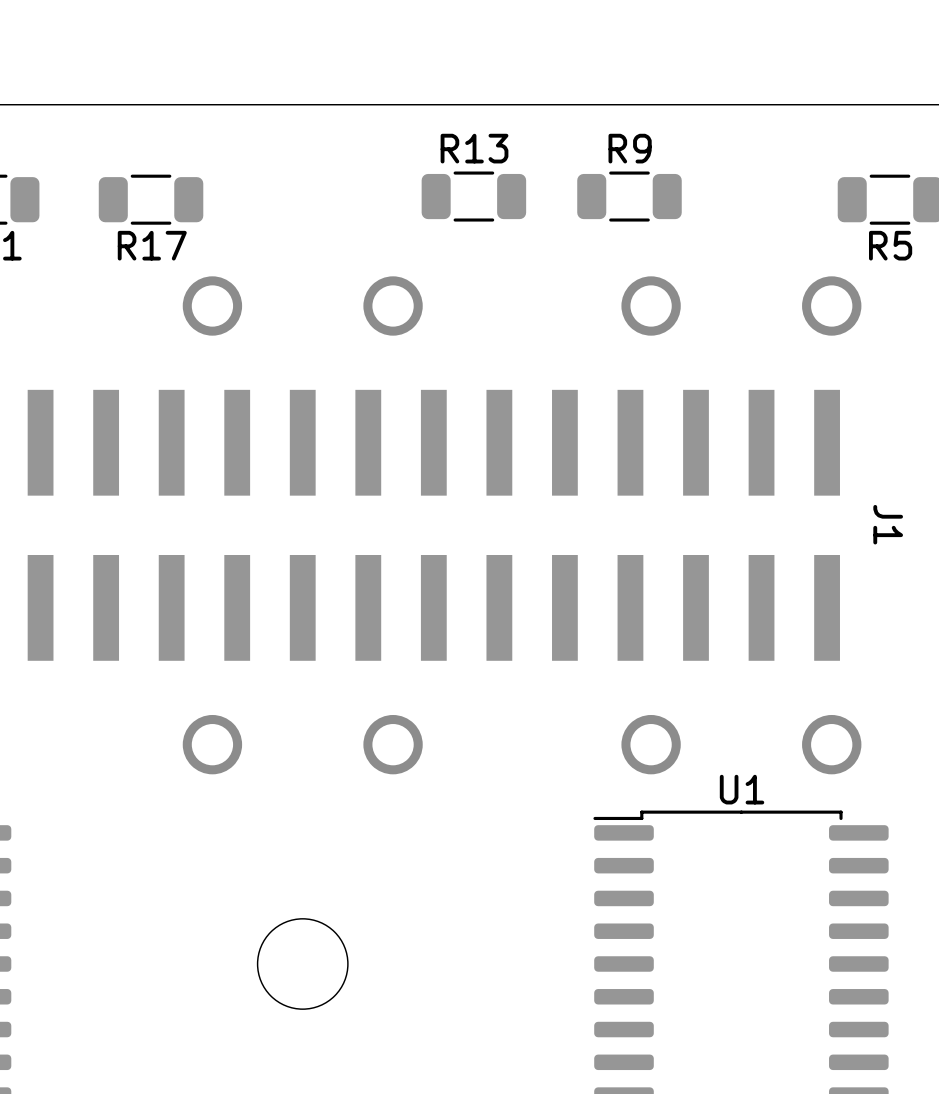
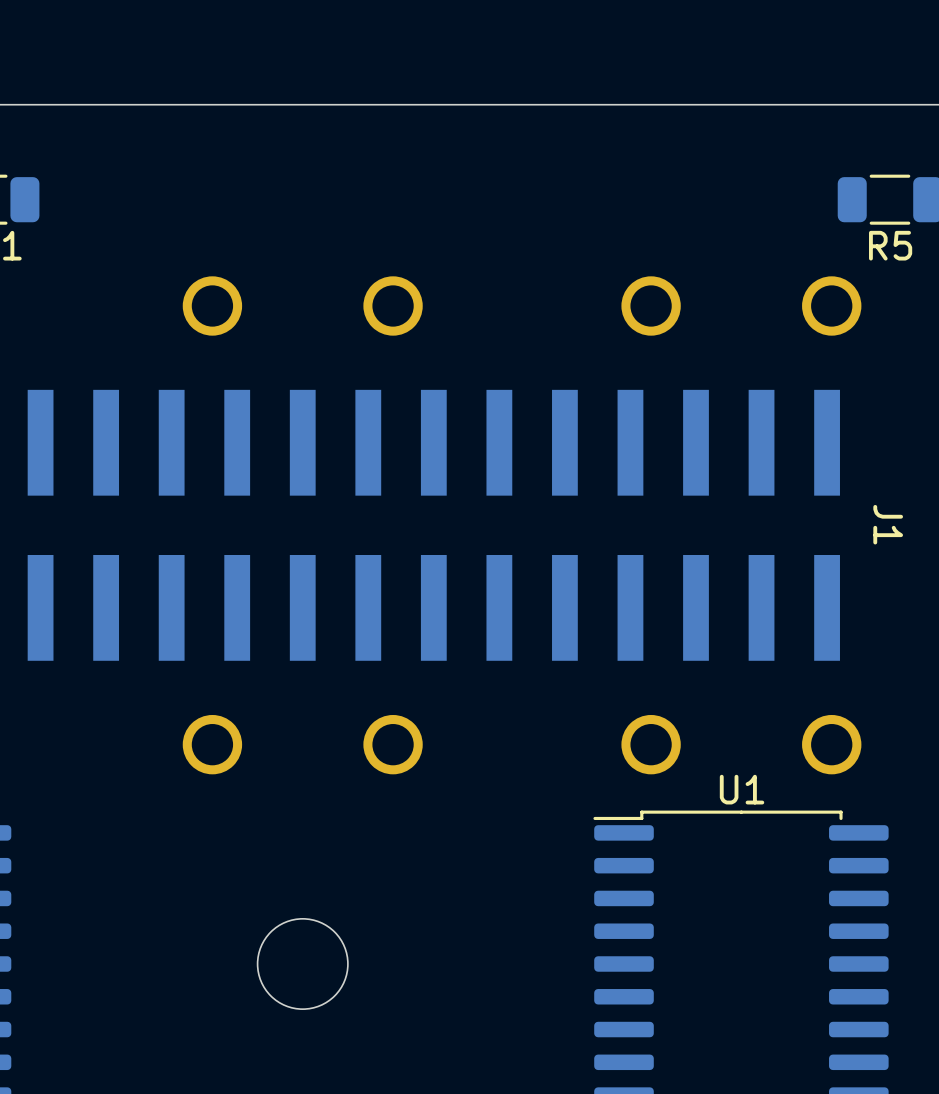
R13: (473, 196) -> none
R9: (629, 196) -> none
R17: (151, 199) -> none

